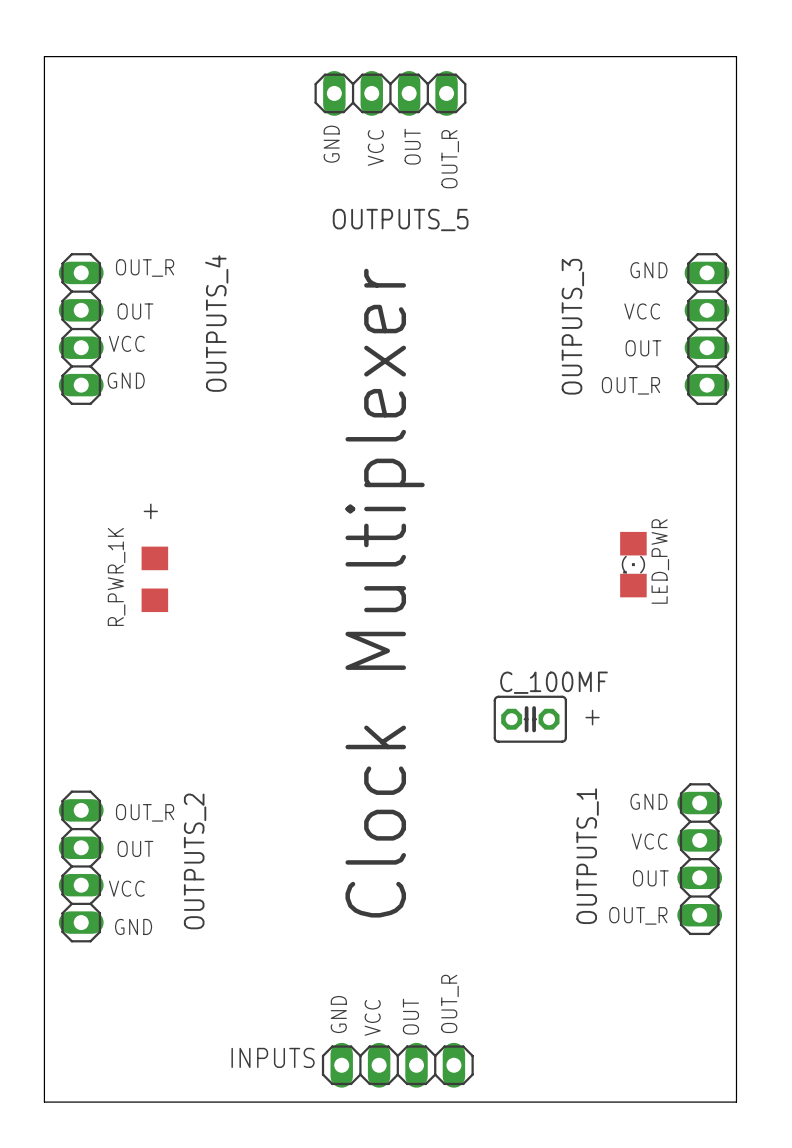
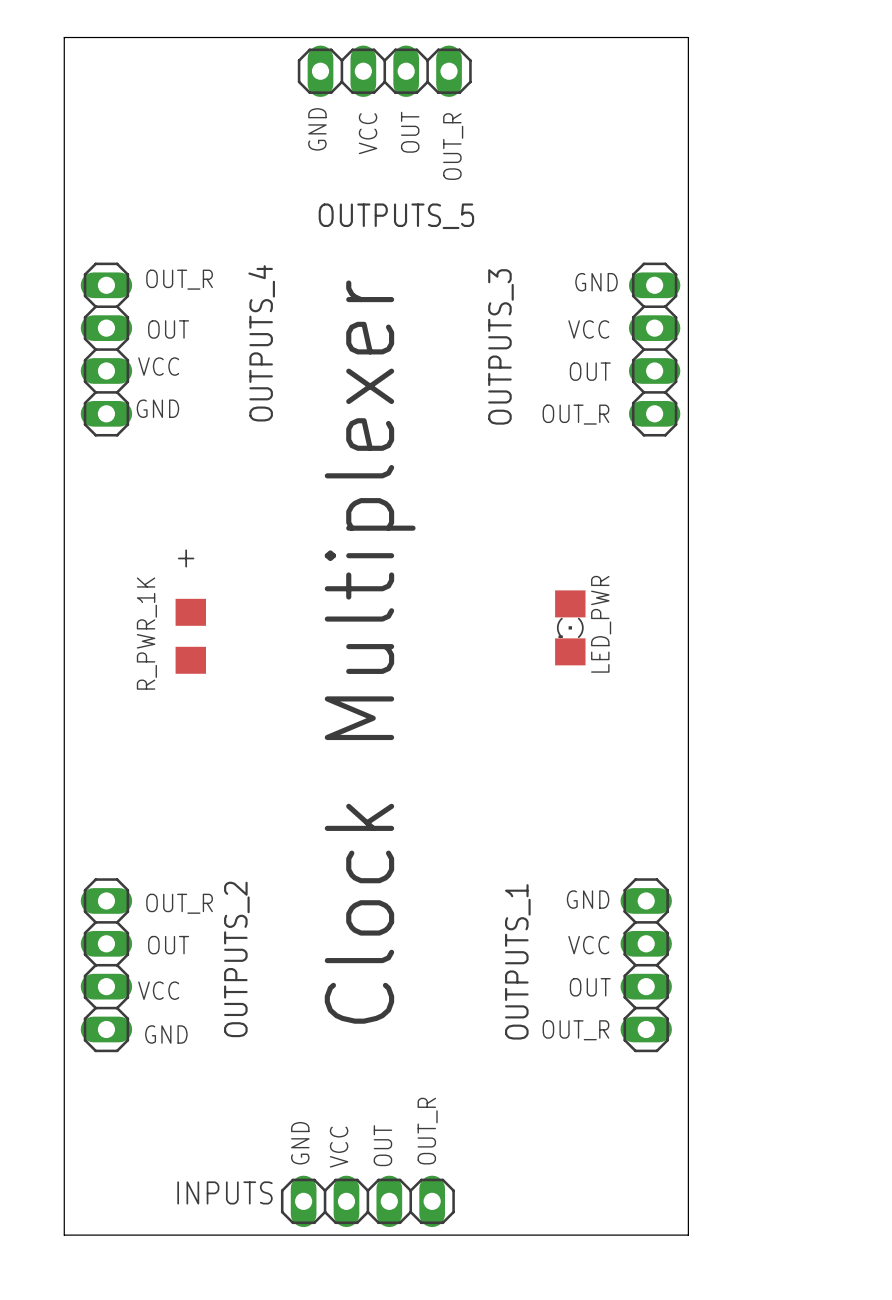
board edge: (589, 56) (736, 56) (736, 1102) (589, 1102) -> (688, 37) (688, 1235)
OUTPUTS_5 position: (390, 93) -> (384, 71)
text position: GND (331, 144) -> GND (317, 129)
text position: OUT (412, 146) -> OUT (410, 132)
text position: VCC (375, 147) -> VCC (368, 133)
text position: OUT_R (450, 159) -> OUT_R (453, 146)
text: none -> GND (596, 282)
text: GND (648, 270) -> none
text: none -> VCC (588, 329)
text: VCC (642, 311) -> none
OUTPUTS_3 position: (707, 329) -> (654, 349)
text: none -> OUT (590, 371)
text: OUT (643, 348) -> none
text: none -> OUT_R (575, 414)
text: OUT_R (630, 385) -> none
LED_PWR position: (633, 564) -> (570, 627)
text position: Clock Multiplexer (385, 593) -> Clock Multiplexer (370, 652)
text: + (592, 717) -> none
C_100MF: (530, 719) -> none
text: GND (648, 801) -> none
text: none -> GND (588, 899)
text: VCC (649, 841) -> none
text: none -> VCC (588, 945)
OUTPUTS_1 position: (699, 859) -> (646, 965)
text: OUT (650, 878) -> none
text: none -> OUT (590, 987)
text: OUT_R (638, 915) -> none
text: none -> OUT_R (575, 1030)
text: OUT_R (449, 1003) -> none
text: none -> OUT_R (427, 1131)
text position: GND (338, 1014) -> GND (300, 1143)
text position: OUT (410, 1016) -> OUT (382, 1145)
text position: VCC (372, 1017) -> VCC (339, 1147)
text position: INPUTS (273, 1057) -> INPUTS (224, 1192)
part position: (397, 1065) -> (367, 1201)

